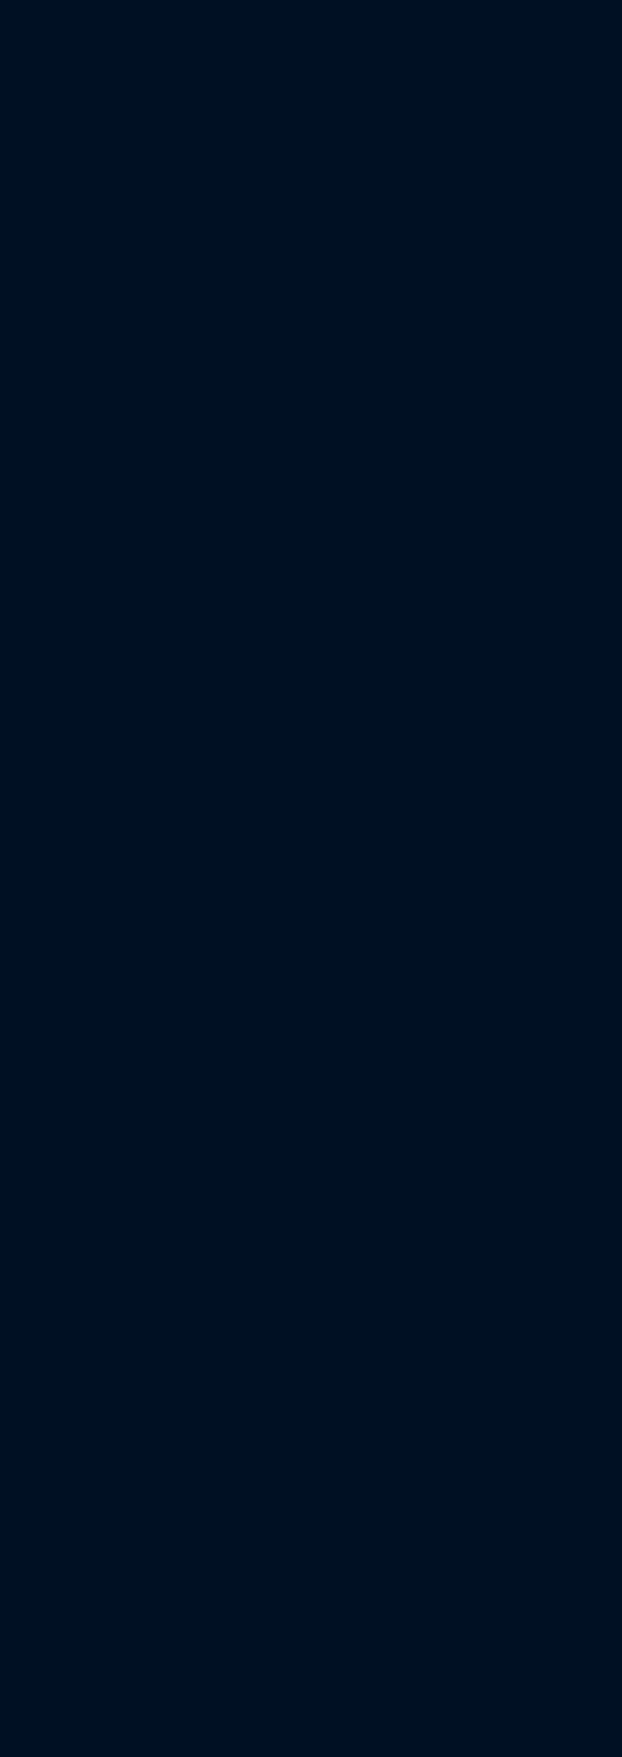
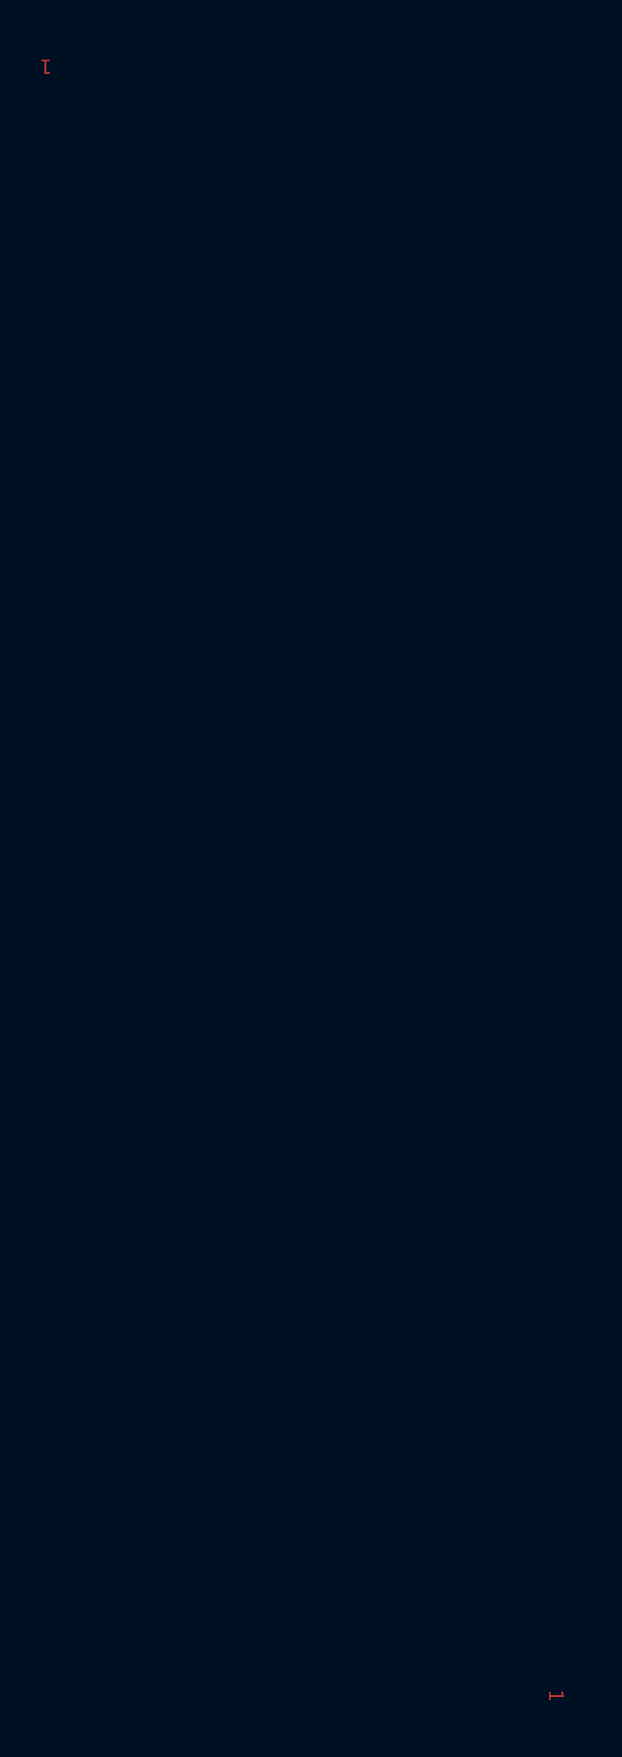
text: none -> 1 (45, 66)
text: none -> 1 (556, 1695)

